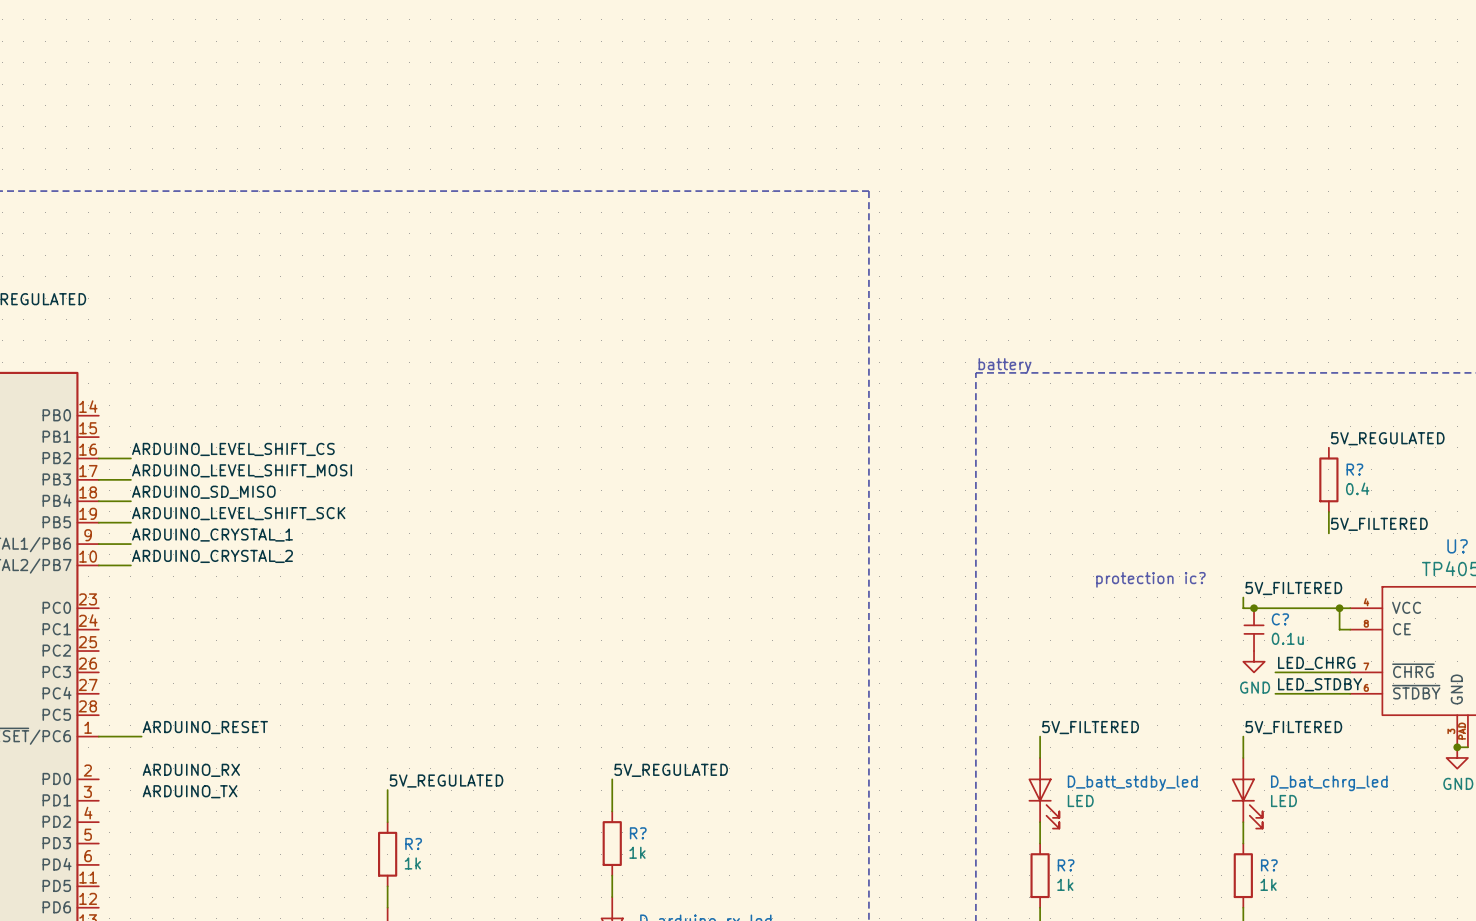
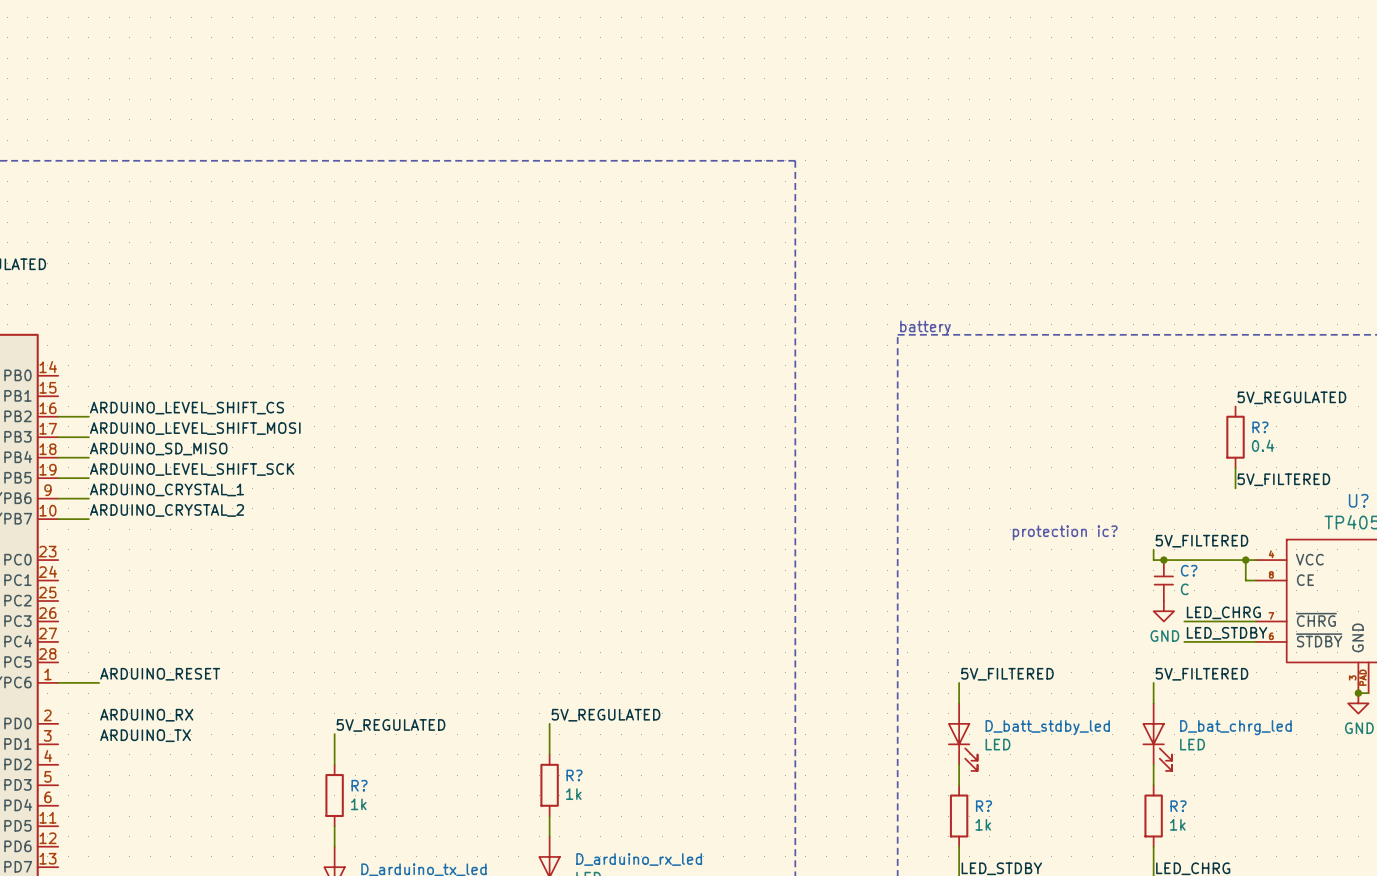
C? value: 0.1u (1287, 638) -> C (1184, 589)

